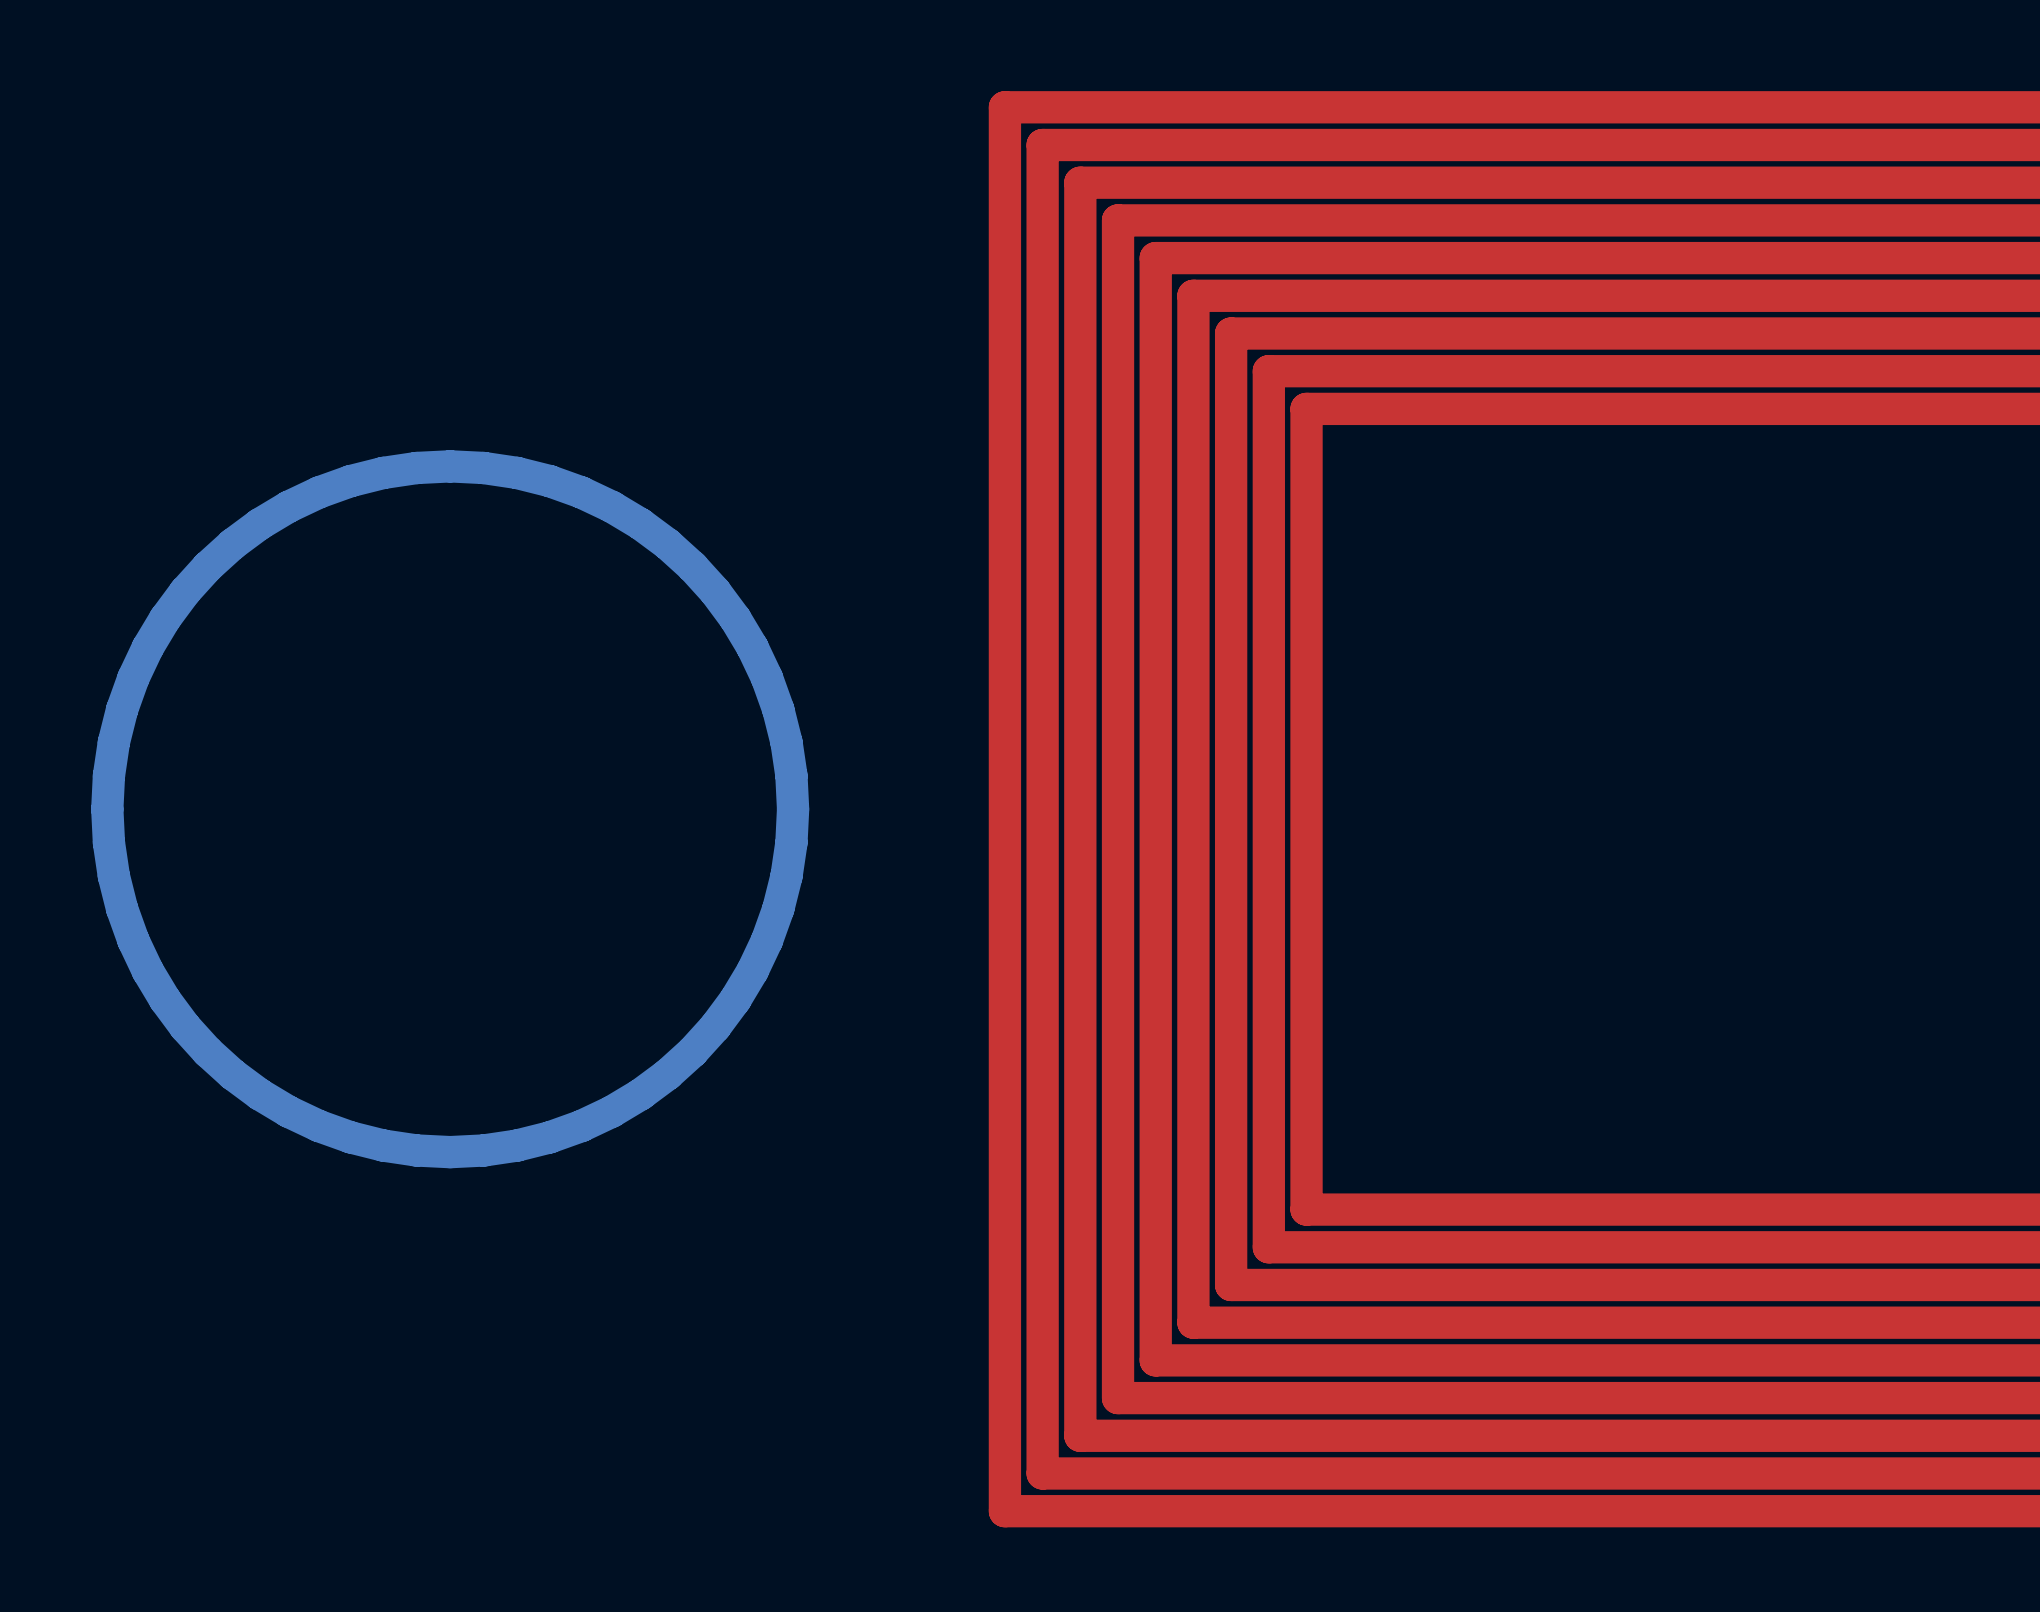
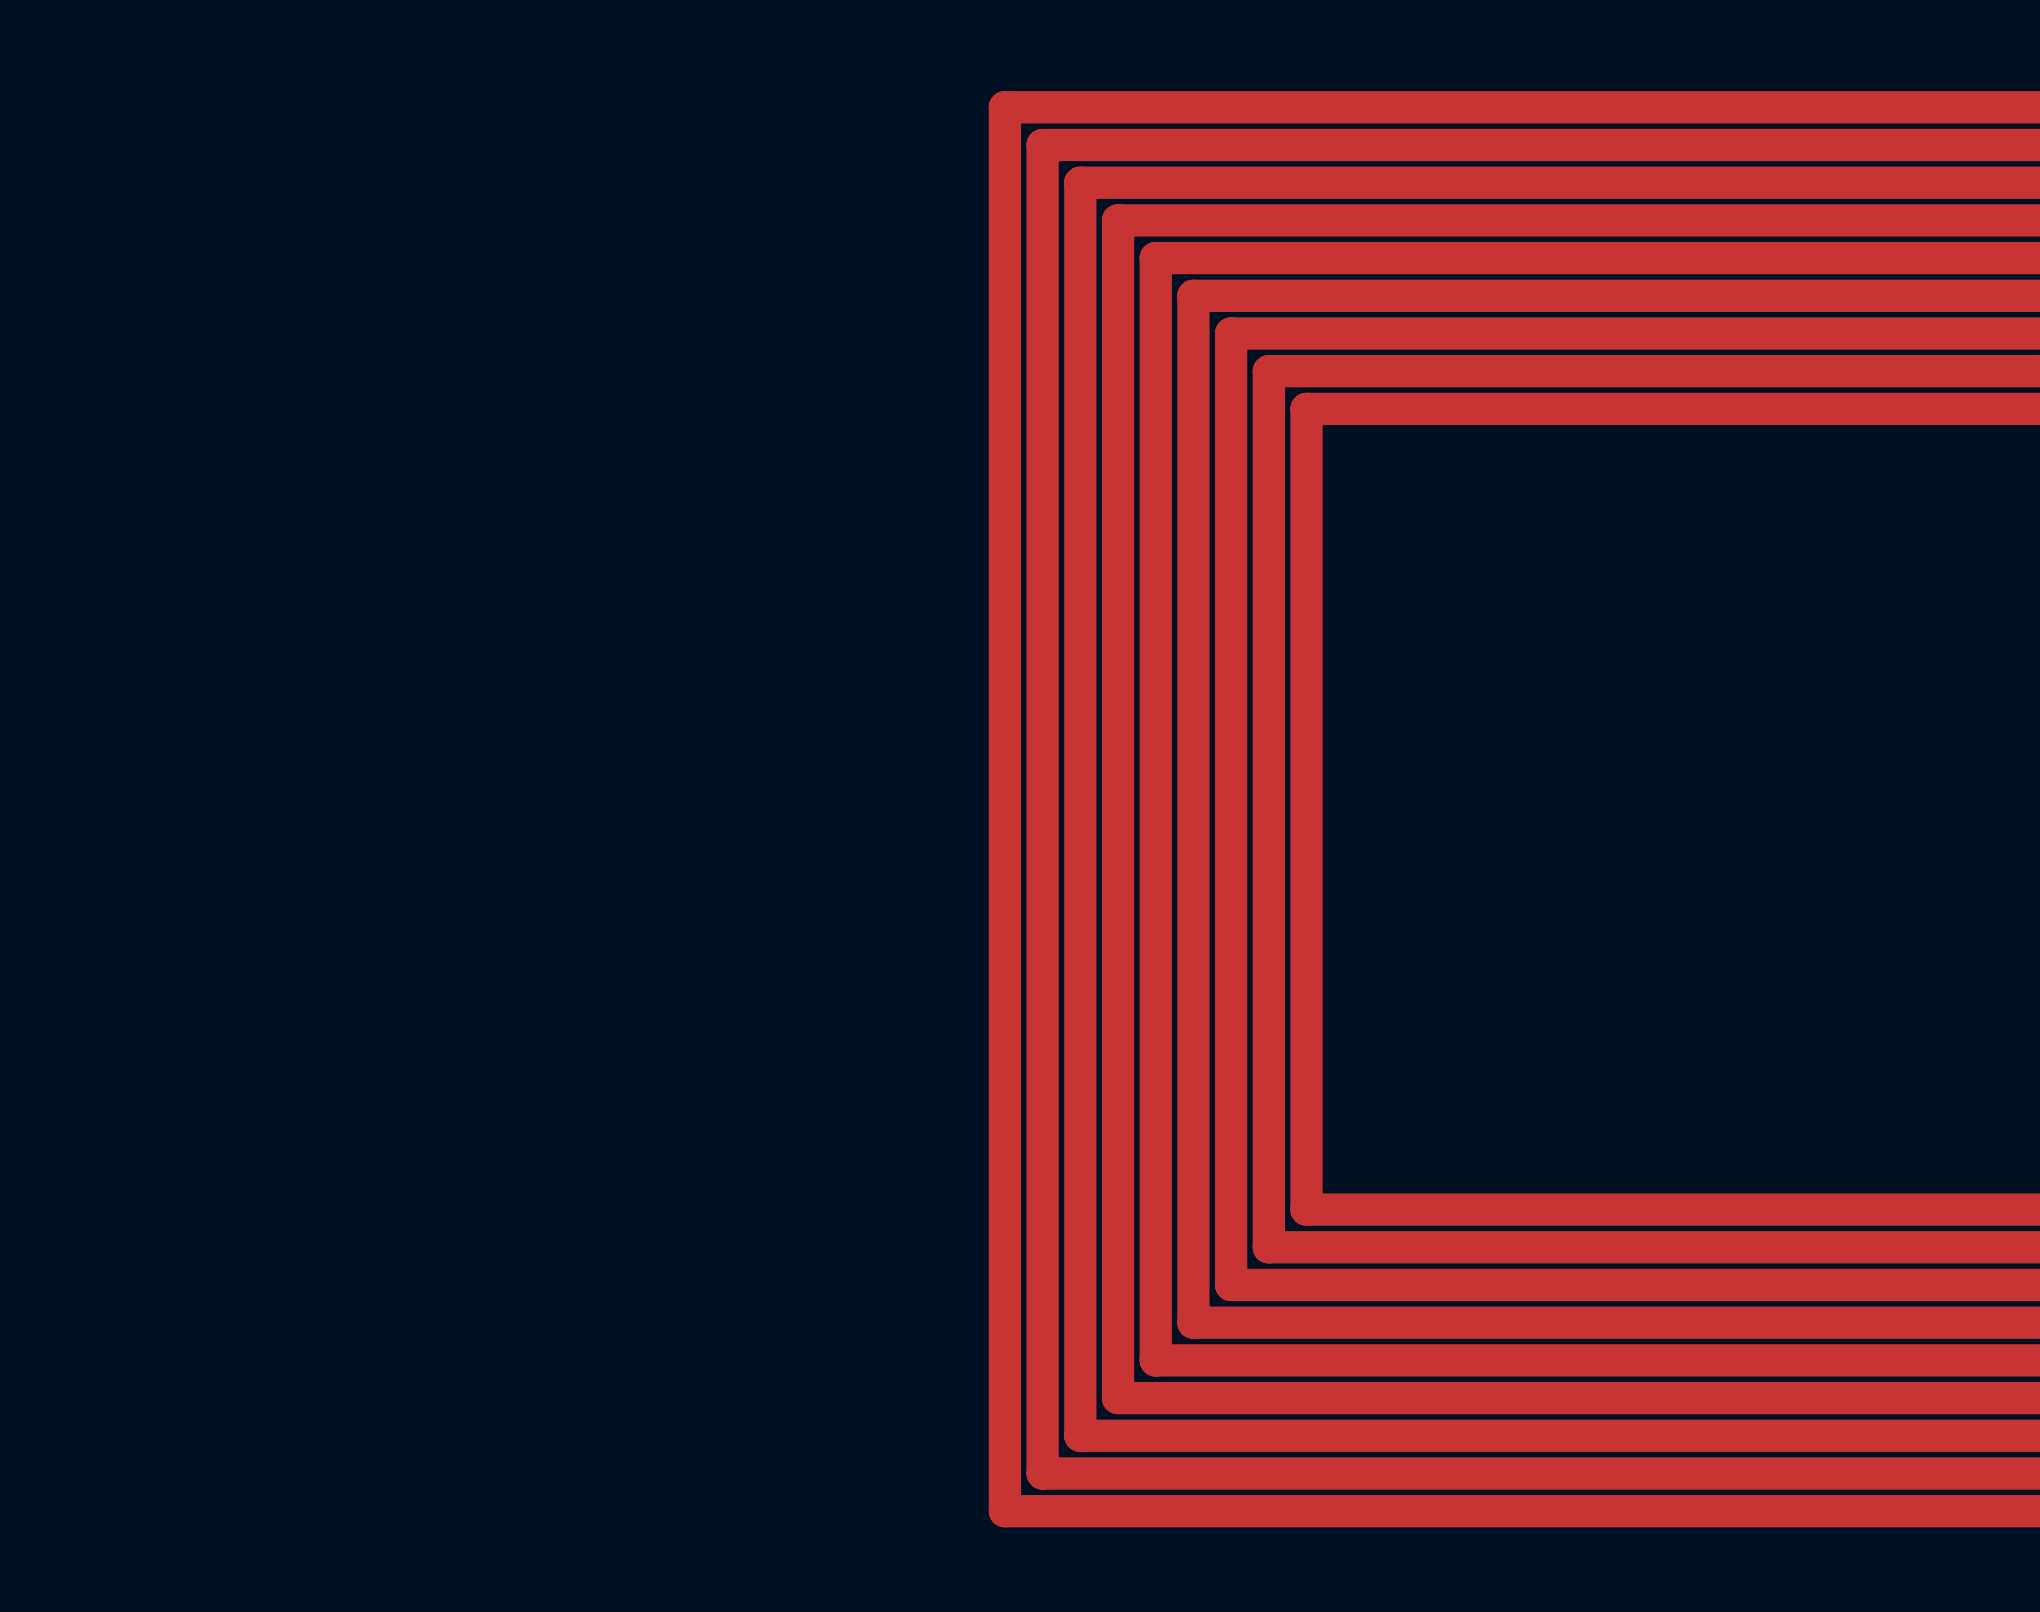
bottom track: (450, 466) (483, 467) (517, 472) (549, 481) (581, 492) (611, 506) (640, 524) (667, 544) (692, 566) (715, 591) (735, 618) (752, 647) (766, 678) (778, 709) (786, 742) (791, 775) (793, 809) (791, 842) (786, 876) (778, 908) (766, 940) (752, 970) (735, 999) (715, 1026) (692, 1051) (667, 1074) (640, 1094) (611, 1111) (581, 1126) (549, 1137) (517, 1145) (483, 1150) (450, 1152) (416, 1150) (383, 1145) (350, 1137) (318, 1126) (288, 1111) (259, 1094) (232, 1074) (207, 1051) (185, 1026) (165, 999) (147, 970) (133, 940) (122, 908) (113, 876) (108, 842) (107, 809) (108, 775) (113, 742) (122, 709) (133, 678) (147, 647) (165, 618) (185, 591) (207, 566) (232, 544) (259, 524) (288, 506) (318, 492) (350, 481) (383, 472) (416, 467) (450, 466) -> none

